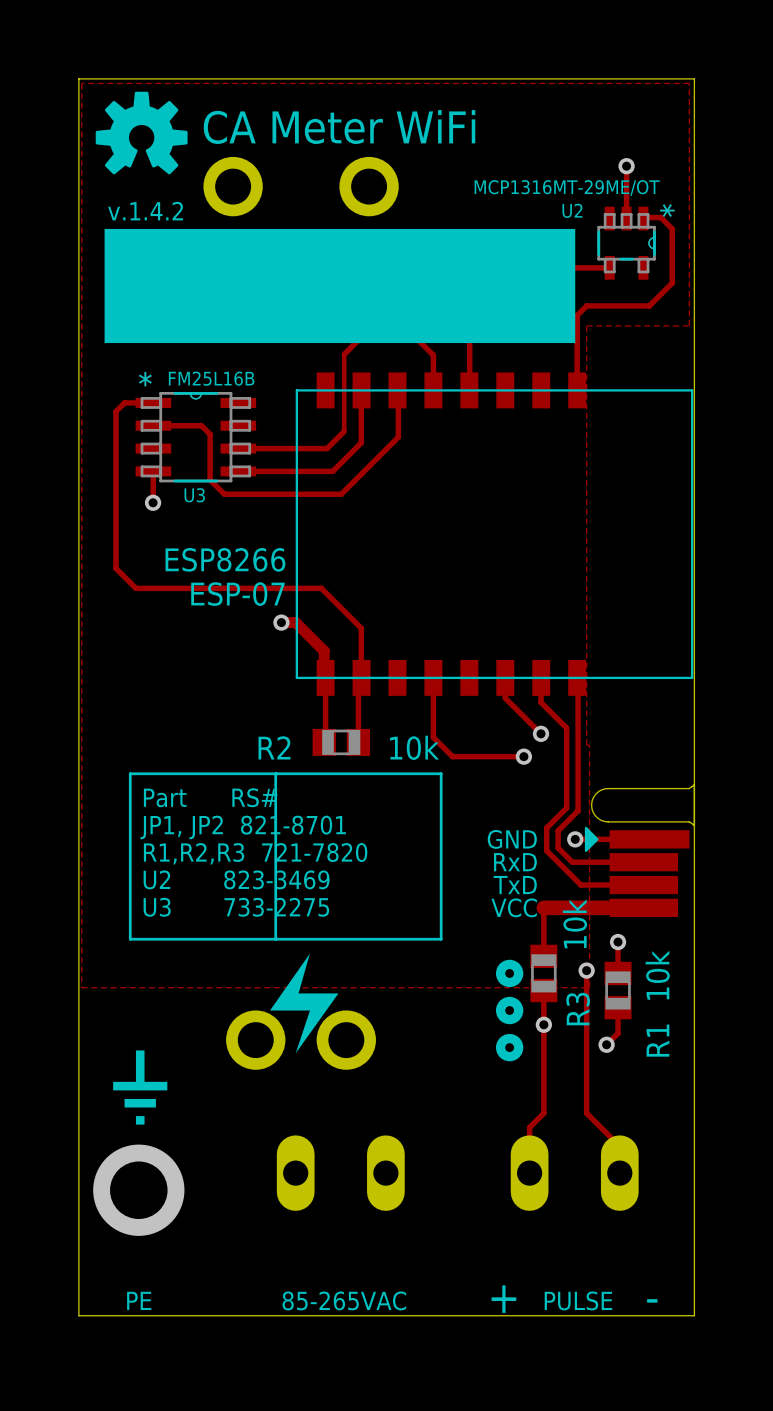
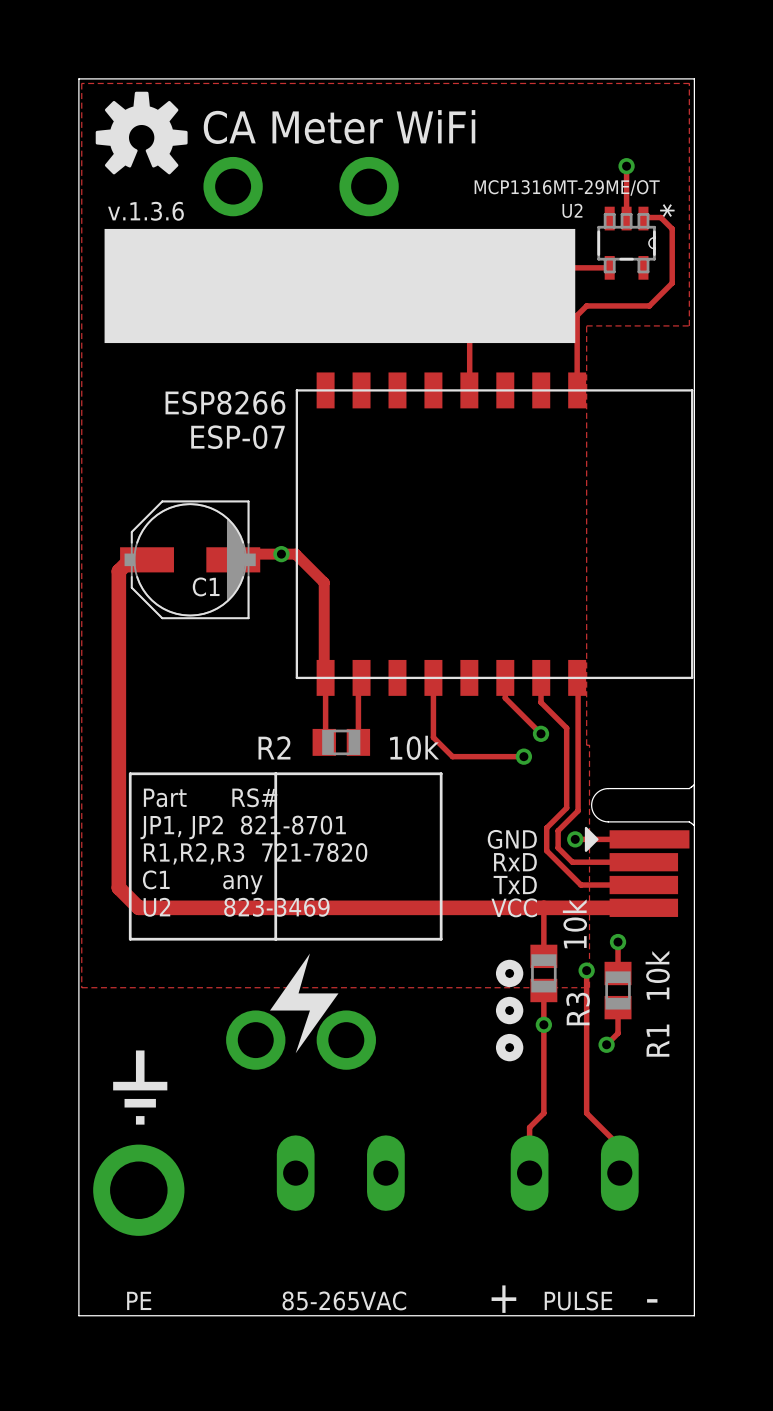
text: v.1.4.2 (145, 211) -> v.1.3.6 (145, 211)
track: (361, 390) (361, 442) (332, 471) (238, 471) -> none
track: (397, 390) (398, 437) (341, 494) (224, 494) (210, 479) (210, 434) (201, 425) (153, 425) -> none
track: (433, 390) (433, 355) (415, 337) (361, 337) (344, 354) (344, 431) (327, 448) (238, 448) -> none
track: (153, 402) (124, 402) (115, 411) (115, 568) (135, 588) (321, 588) (361, 628) (361, 677) -> none
U3: FM25L16B (195, 437) -> none
track: (153, 471) (153, 502) -> none
via: (153, 502) -> none
C1: none -> (190, 559)
text position: ESP8266 (225, 559) -> ESP8266 (225, 402)
track: none -> (147, 560) (130, 559) (118, 571) (118, 887) (138, 907) (543, 907)
text position: ESP-07 (237, 594) -> ESP-07 (237, 437)
track: (281, 622) (295, 622) (324, 651) -> (233, 559) (238, 554) (295, 554) (324, 582) (324, 651)
via position: (281, 622) -> (281, 554)
text: U2 823-3469 (236, 879) -> C1 any (202, 882)
text: U3 733-2275 (236, 907) -> U2 823-3469 (236, 907)

